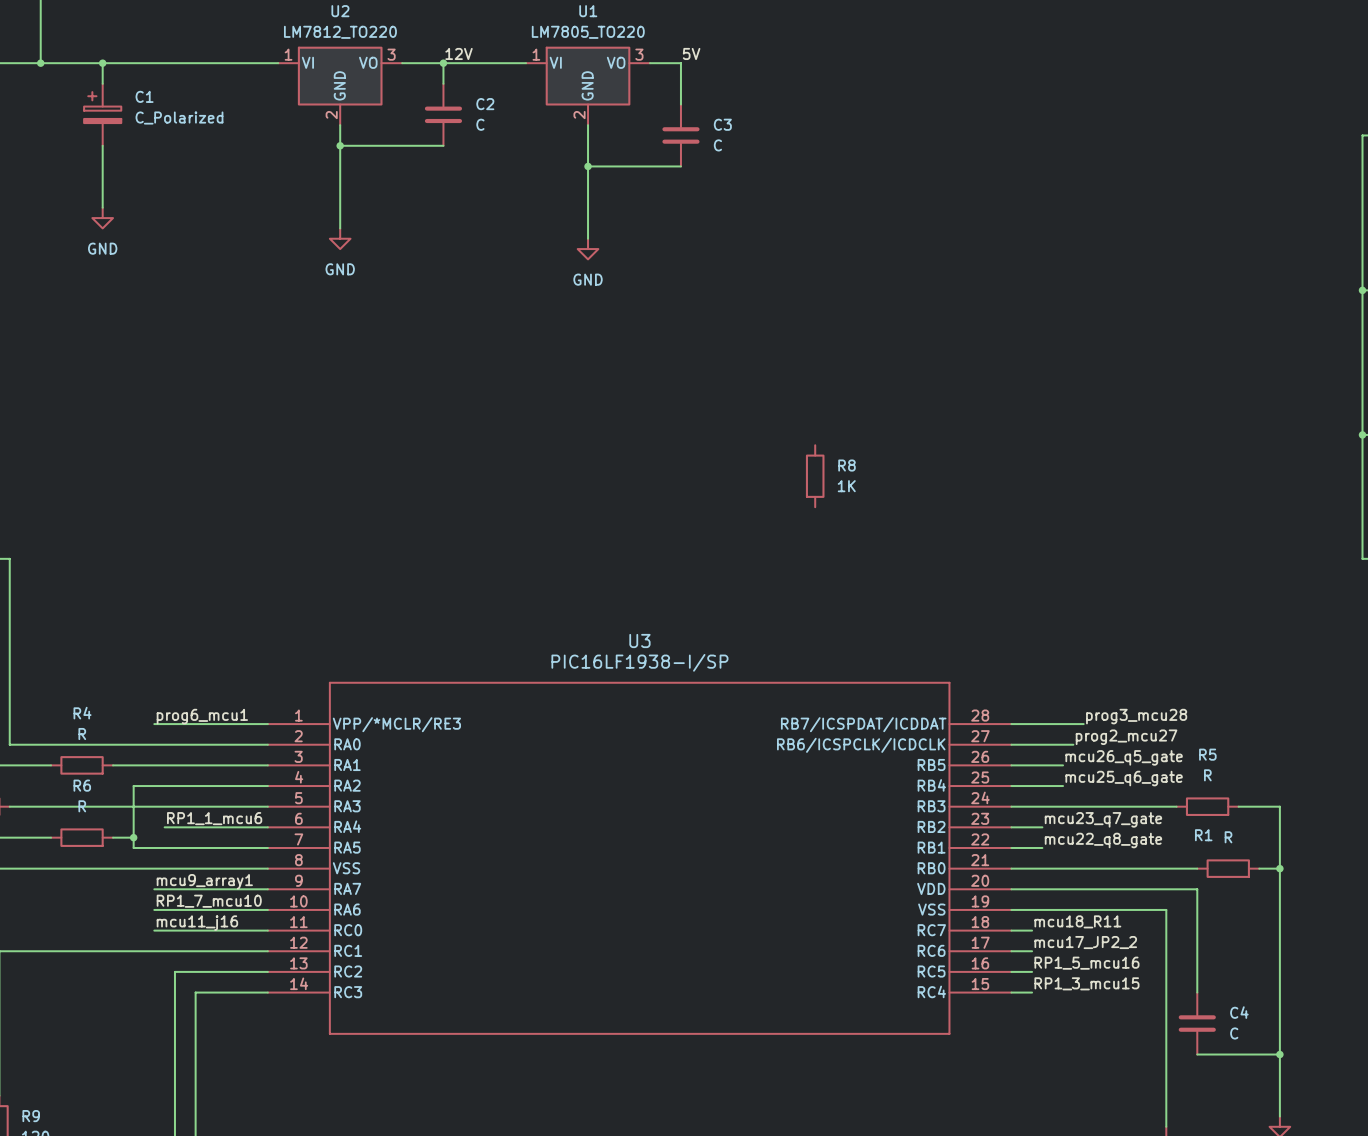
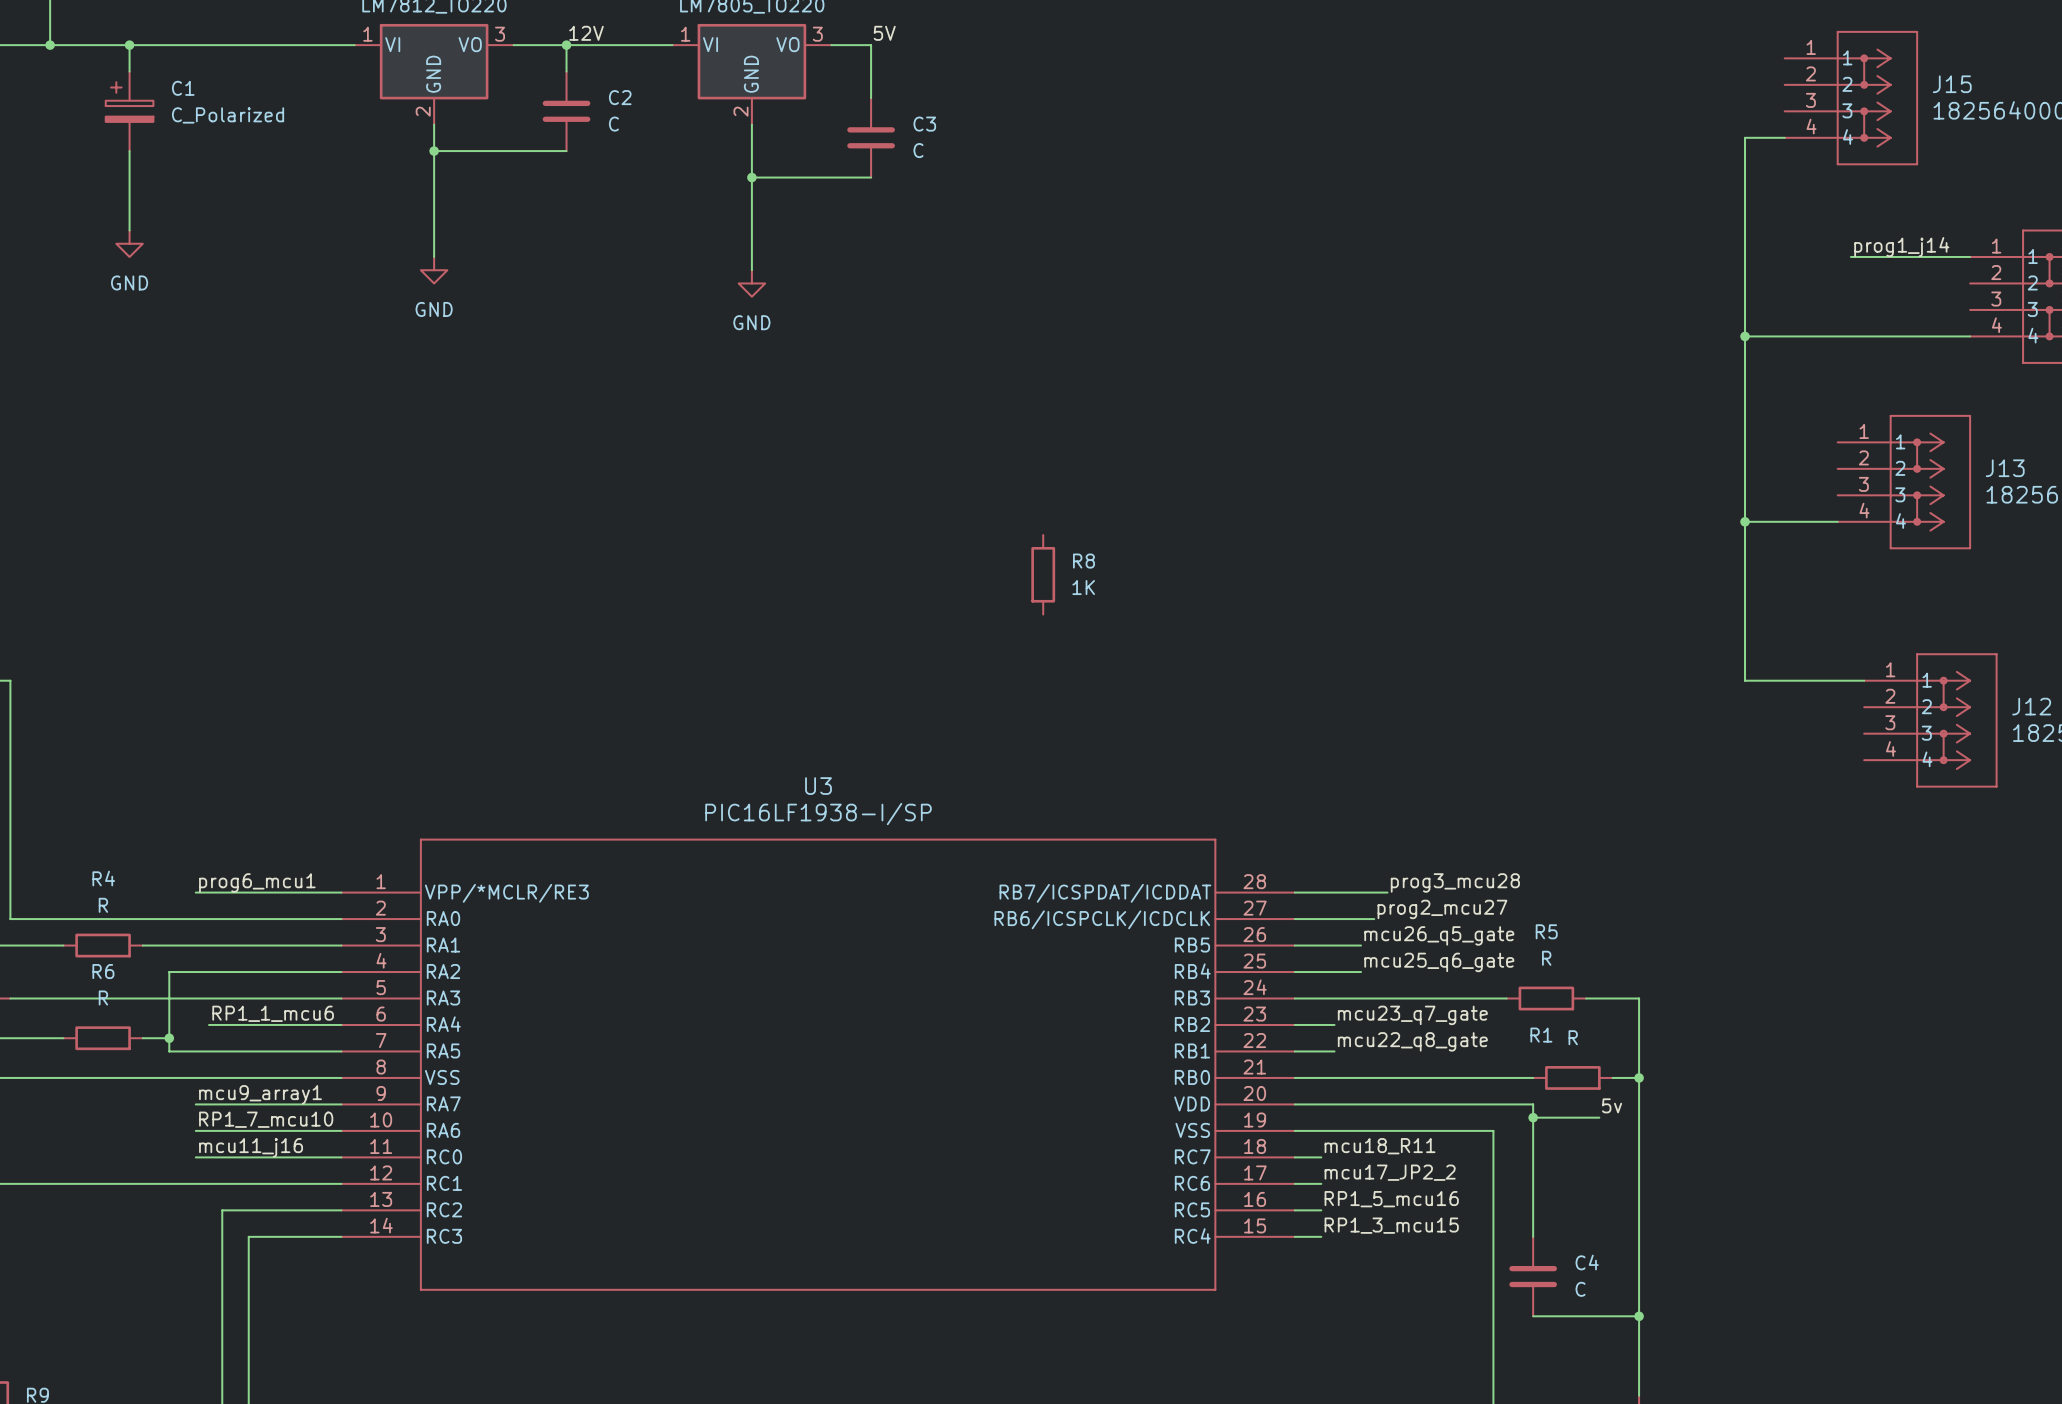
label: none -> 5v (1612, 1105)
wire: none -> (1533, 1117) (1599, 1117)
junction: none -> (1533, 1117)

